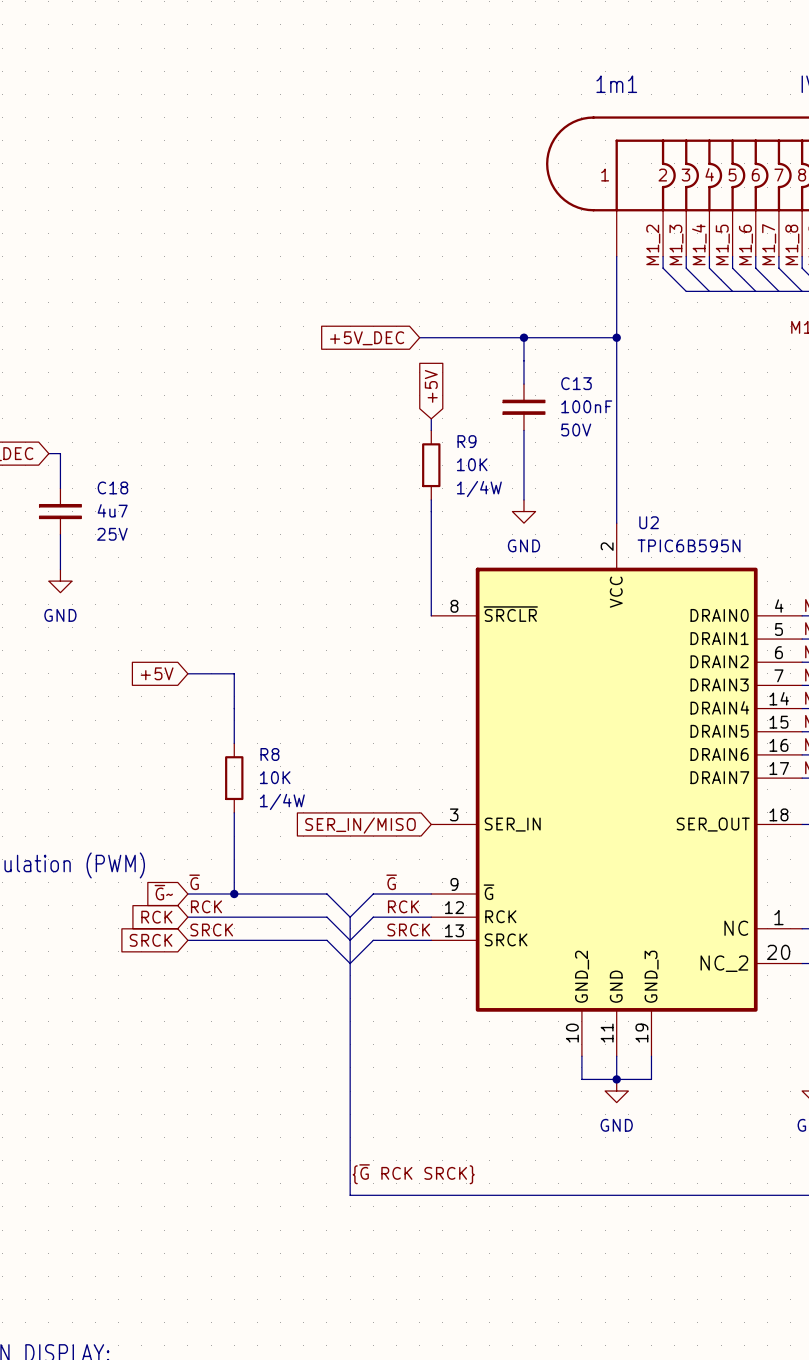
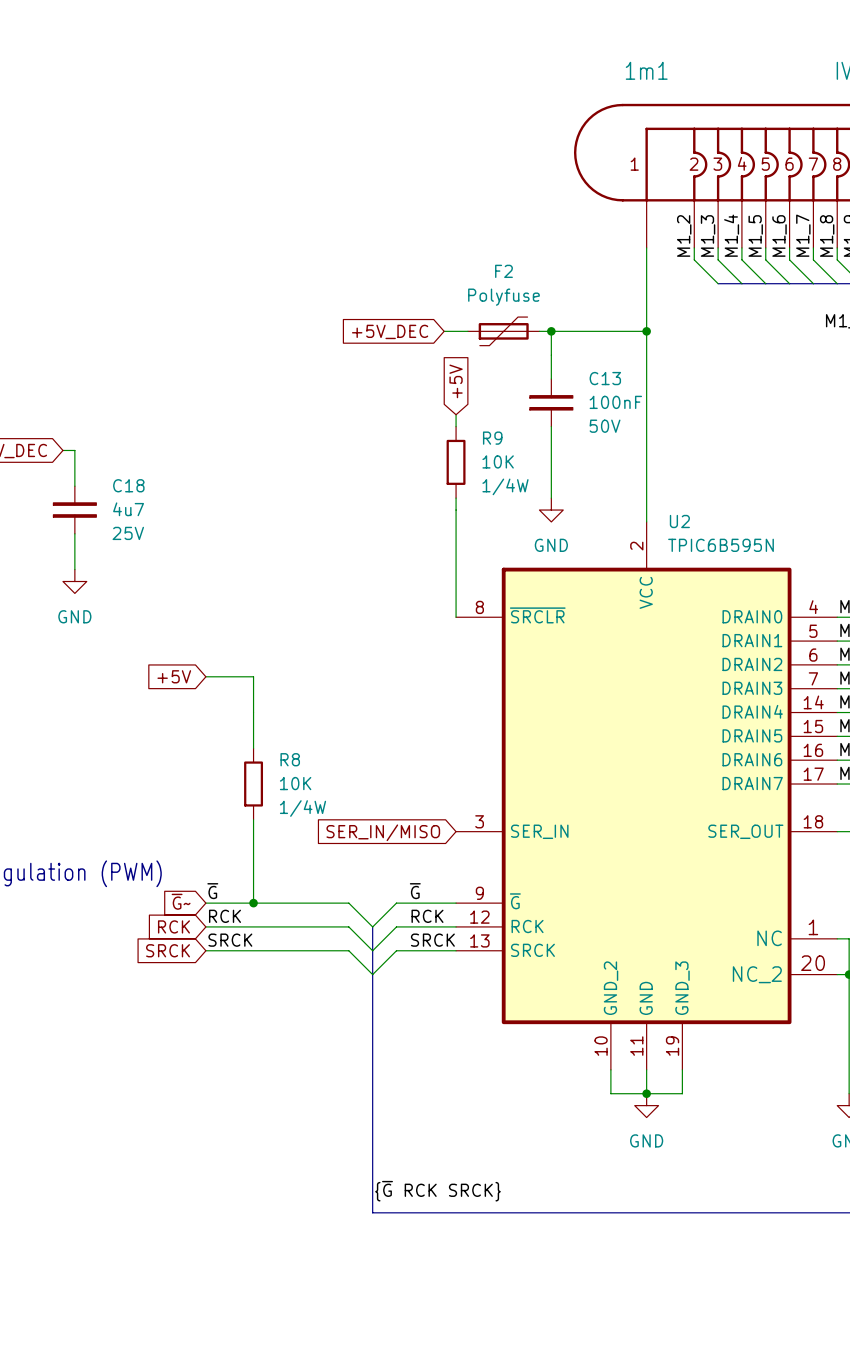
F2: none -> Polyfuse (503, 331)

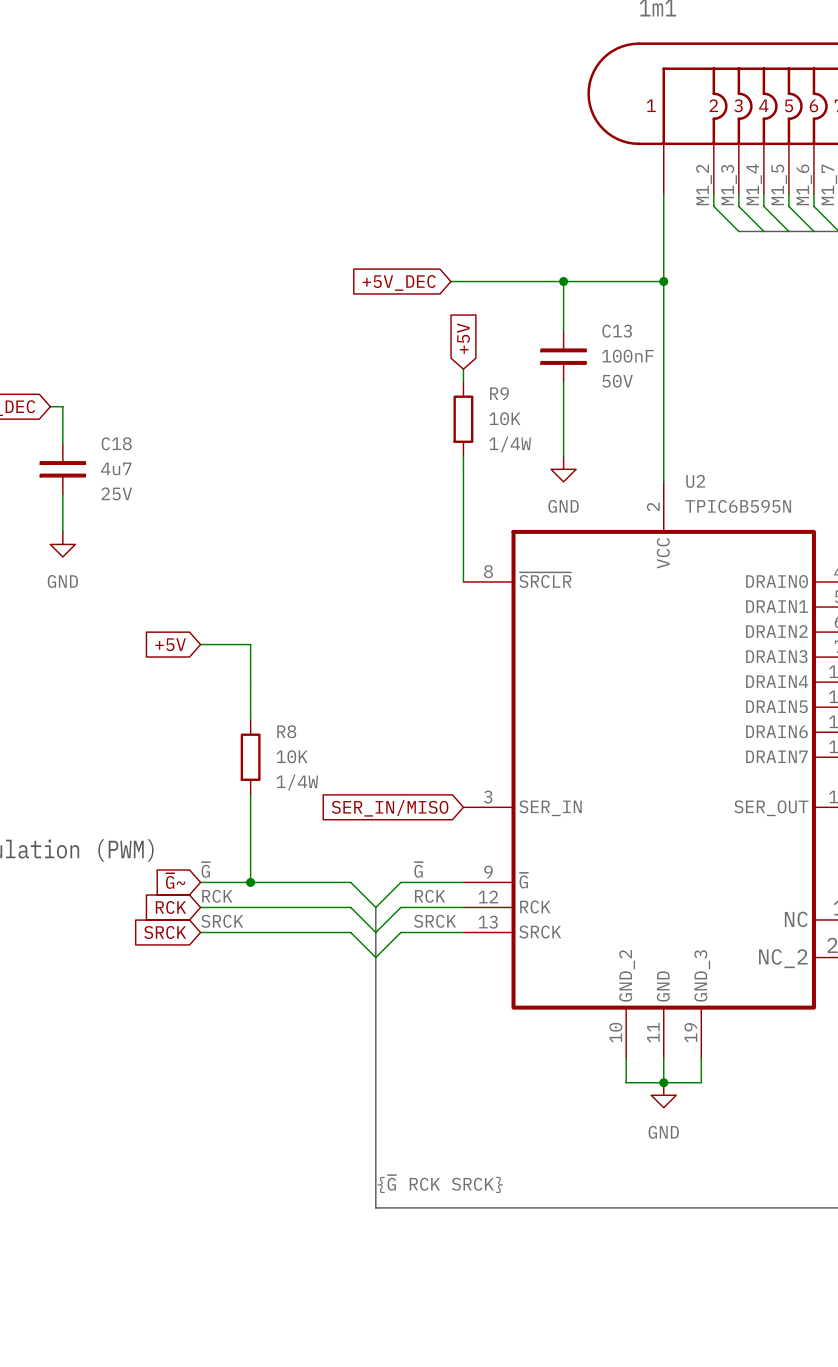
F2: Polyfuse (503, 331) -> none

